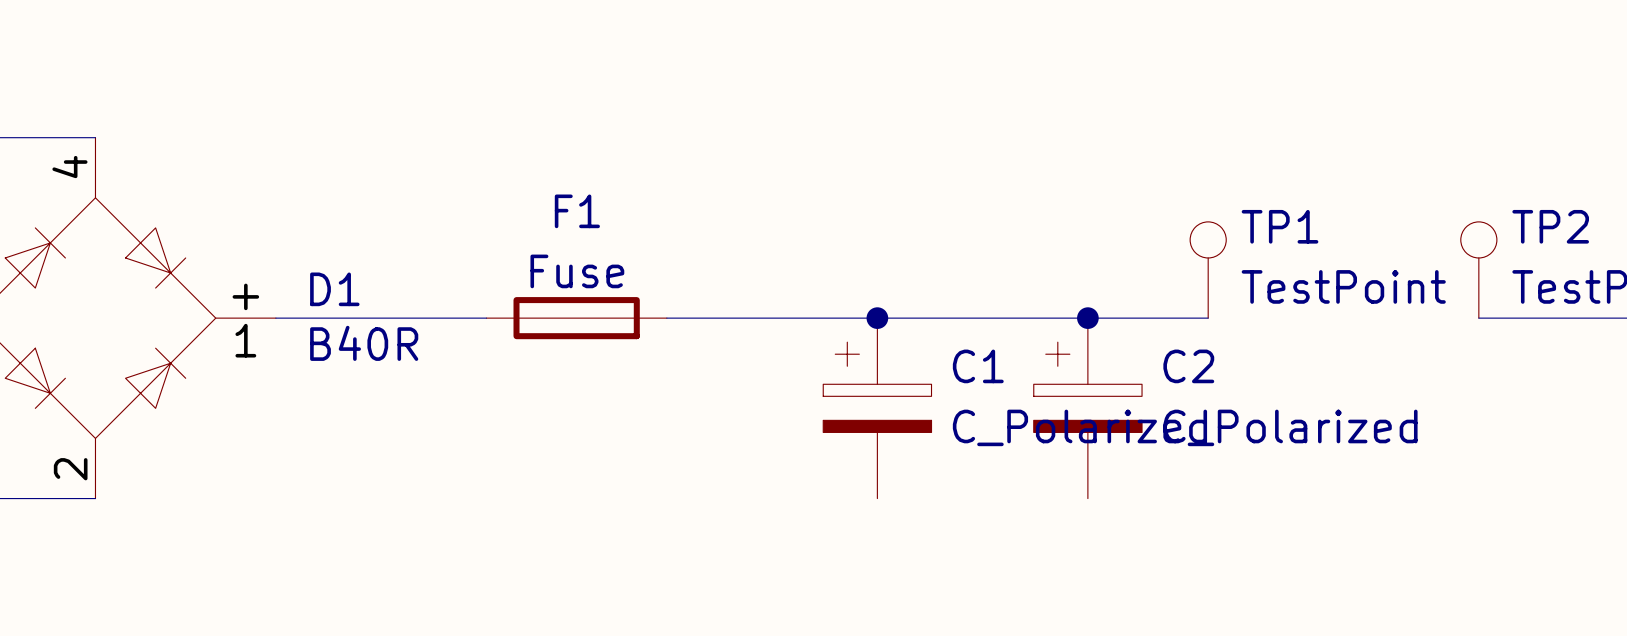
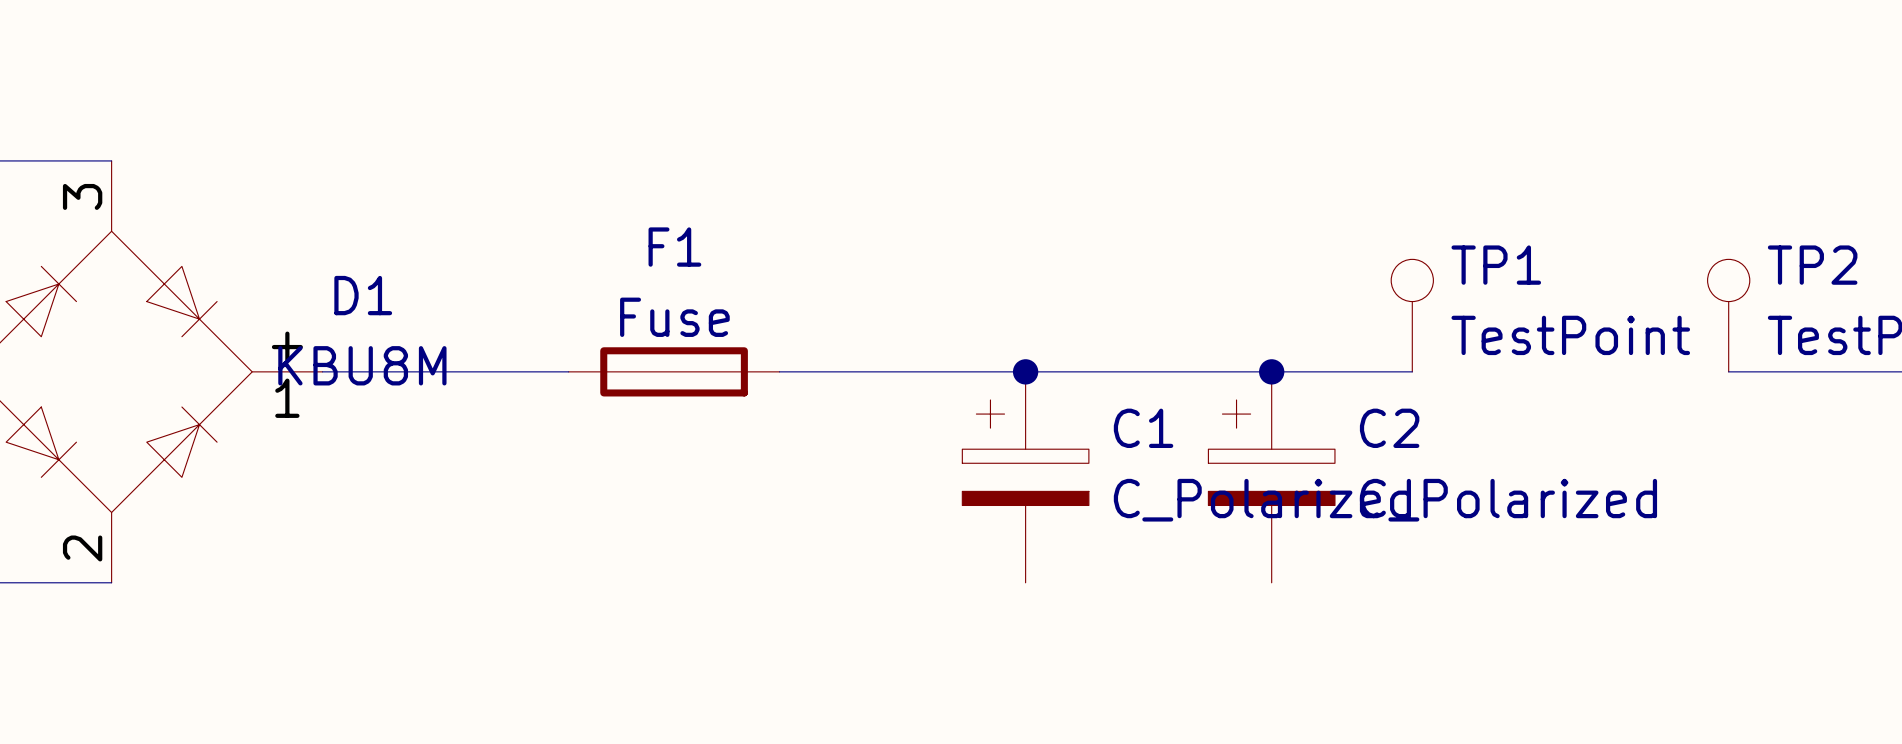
D1 pin number: 4 (69, 167) -> 3 (82, 196)
D1 name position: D1 (334, 289) -> D1 (363, 295)
D1 value: B40R (364, 343) -> KBU8M (362, 365)

